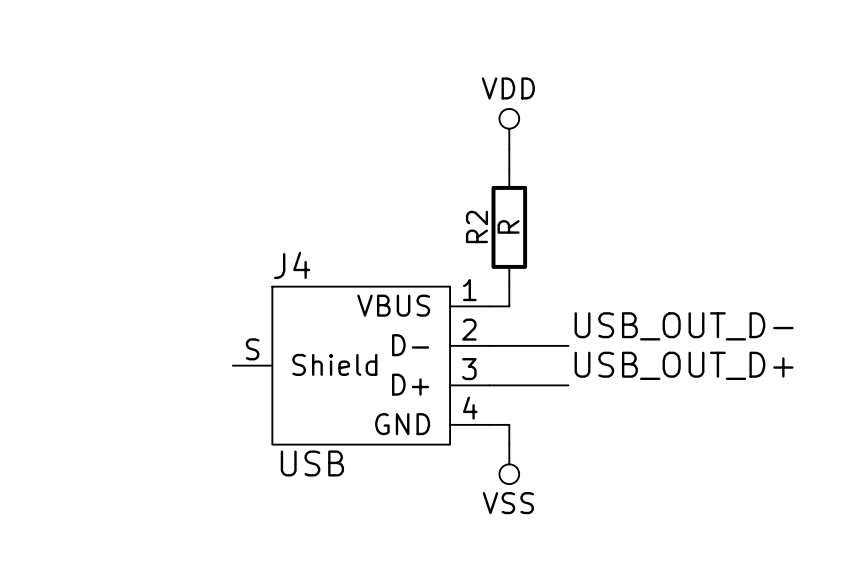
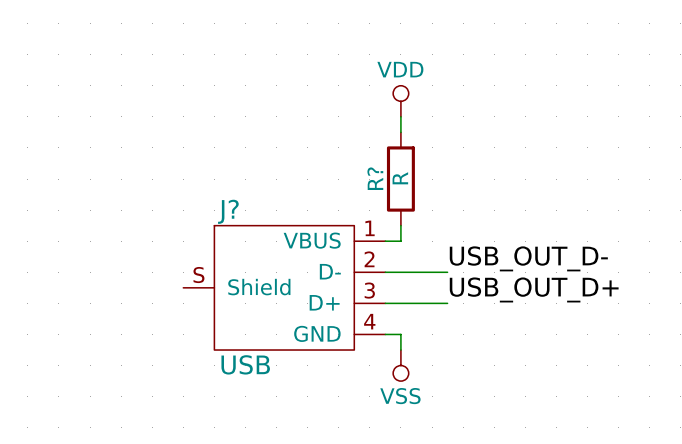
R2 name: R2 (476, 226) -> R? (375, 178)
J4 name: J4 (292, 265) -> J? (228, 211)

